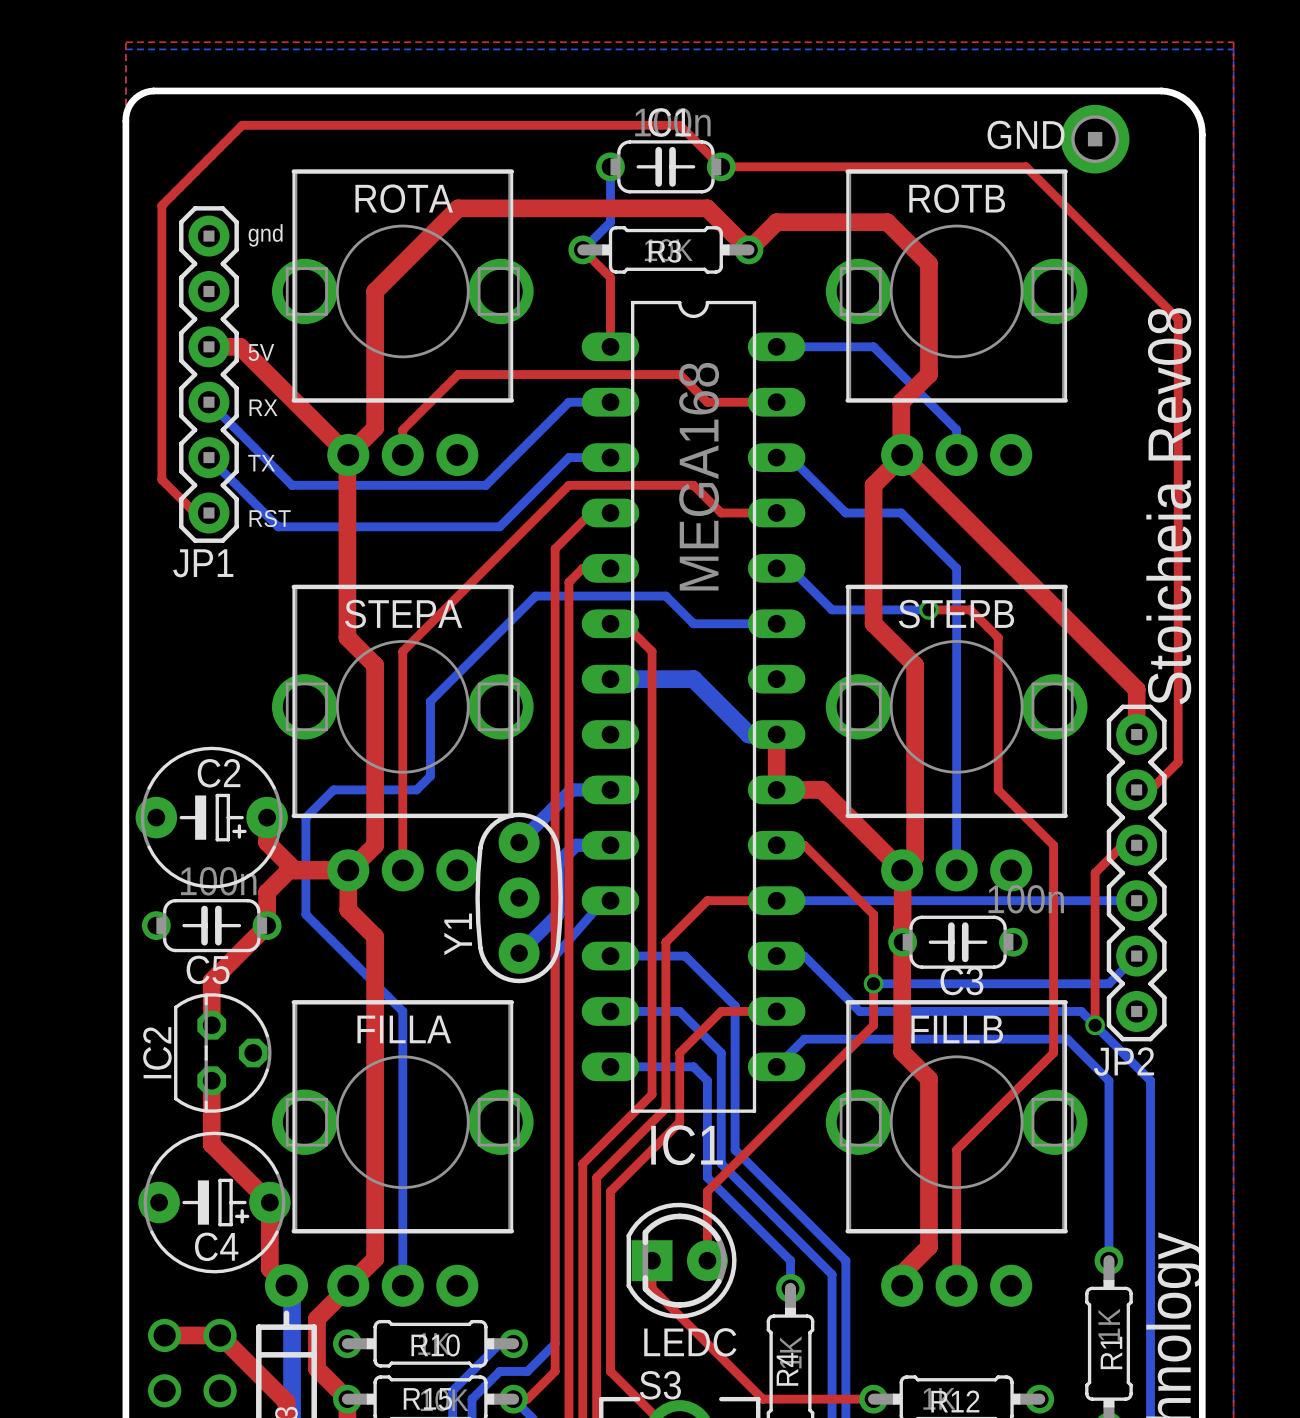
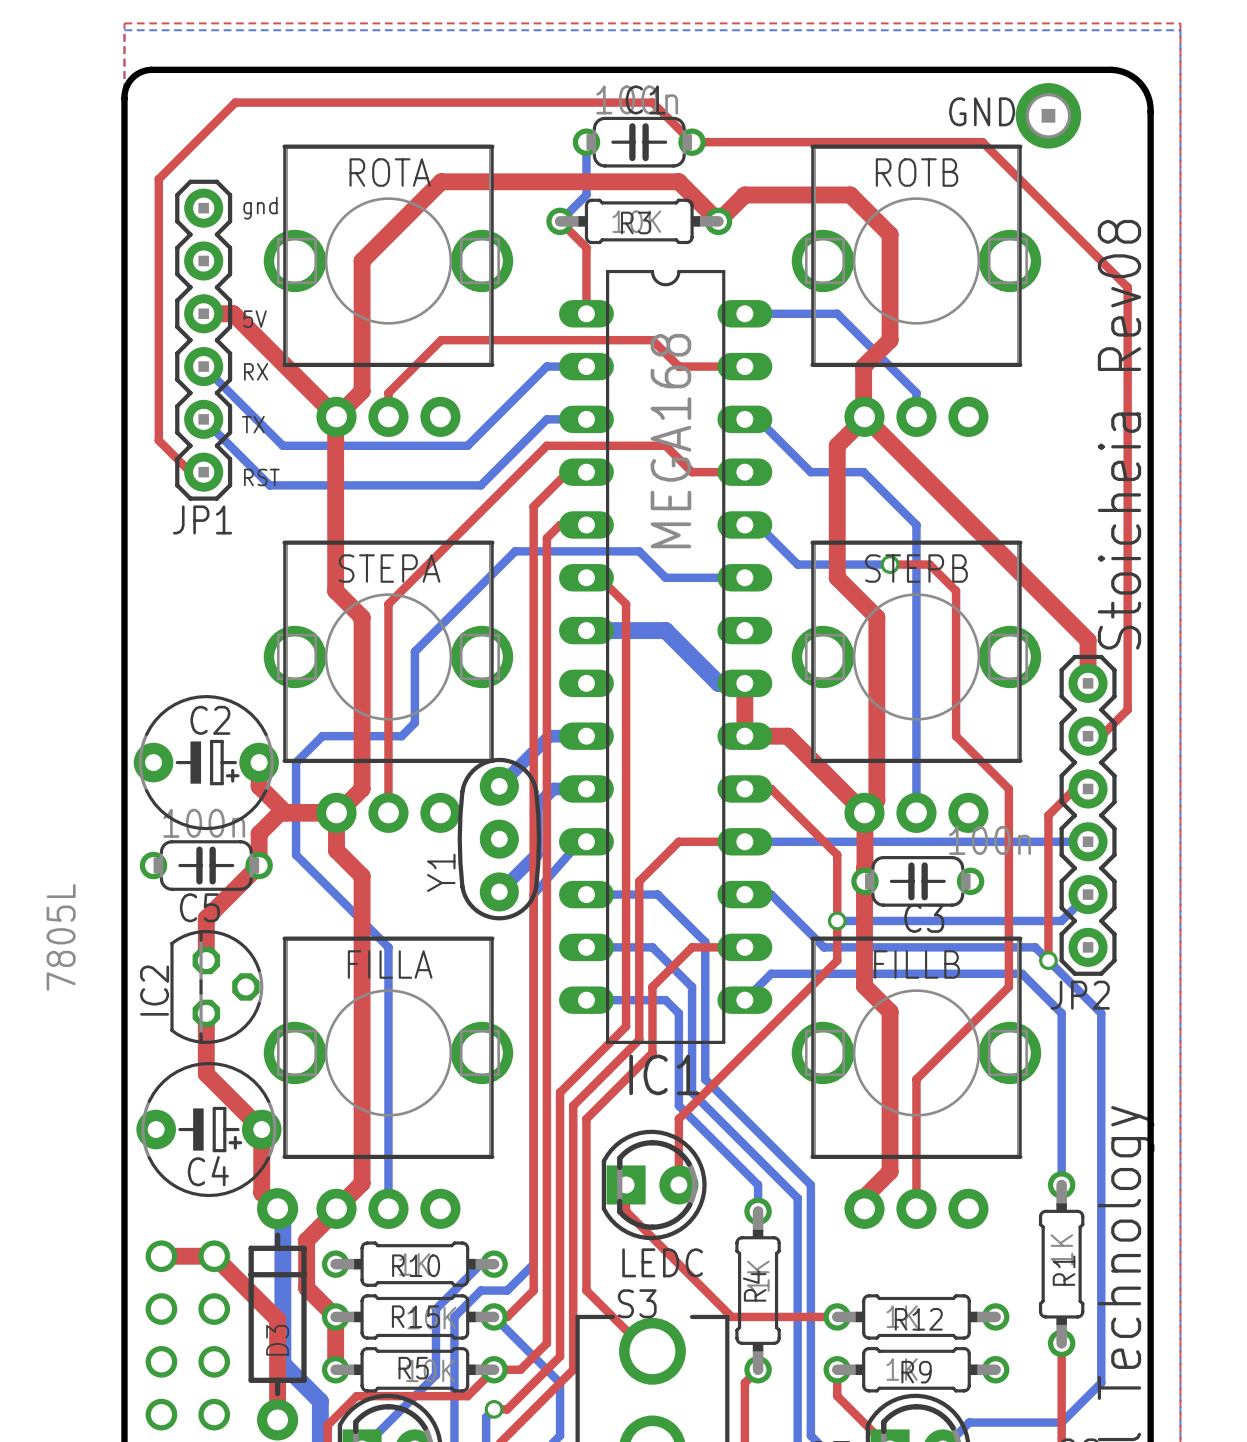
IC2 value: none -> 7805L (61, 937)

